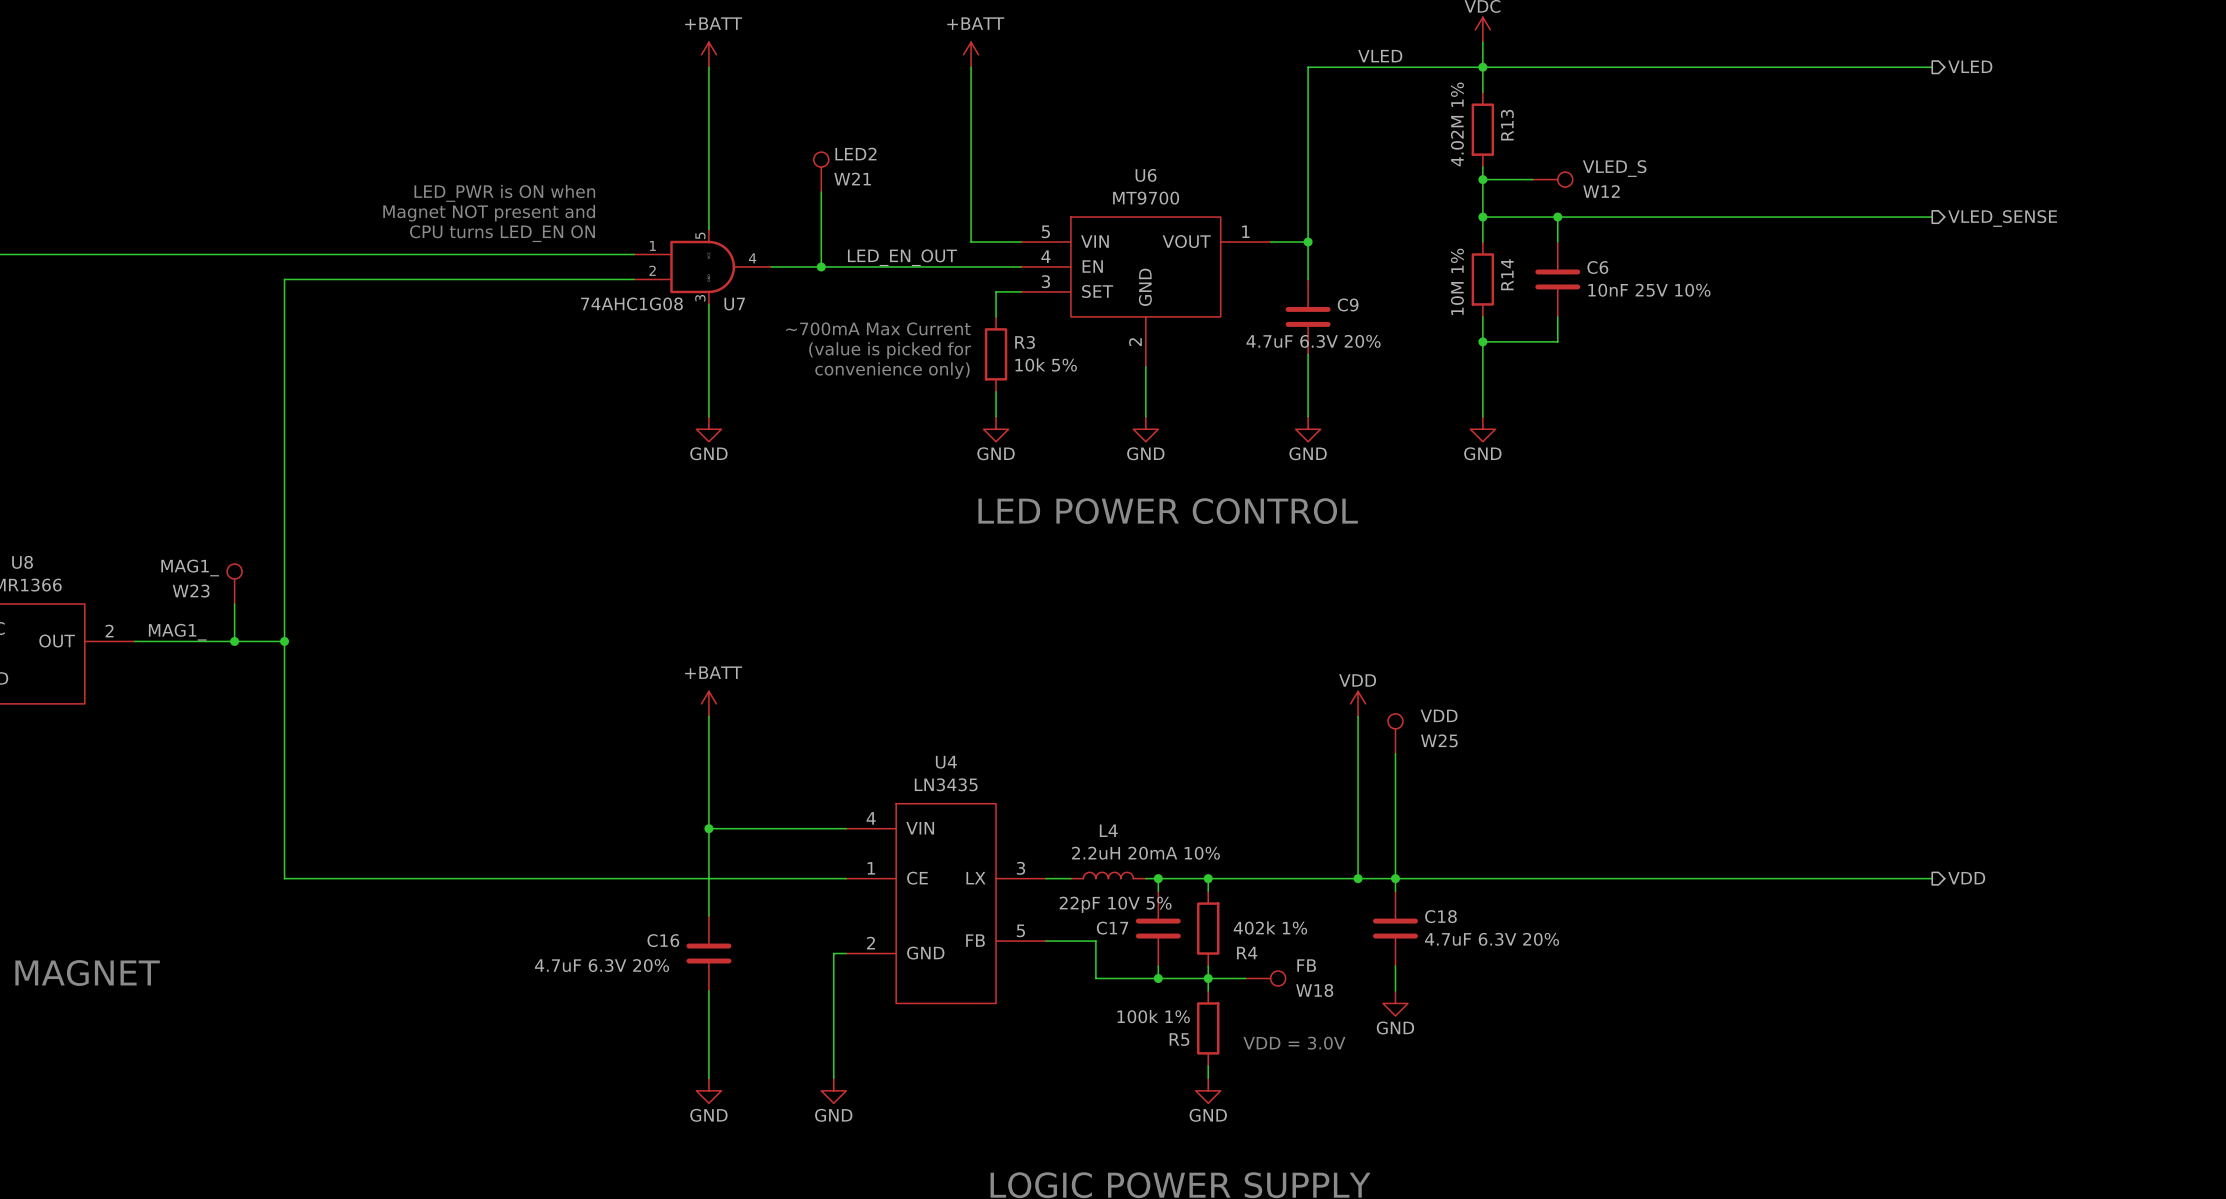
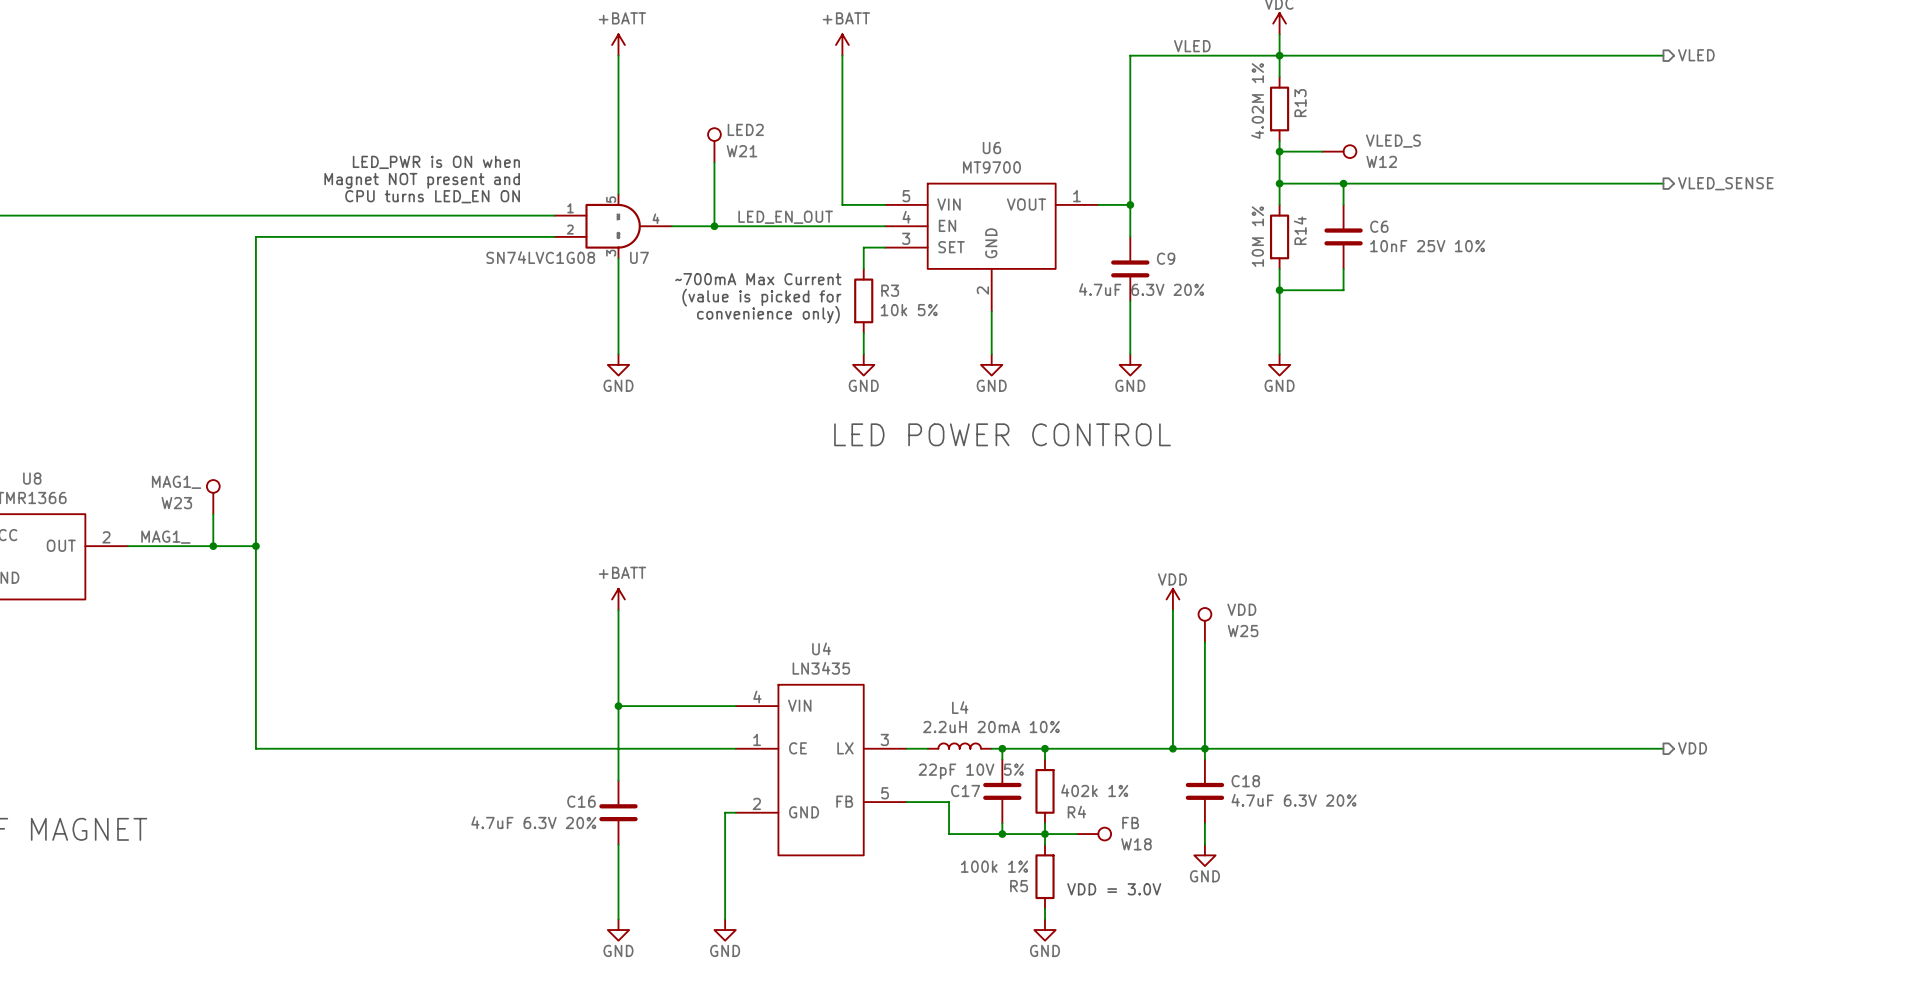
U7 value: 74AHC1G08 (631, 303) -> SN74LVC1G08 (540, 257)

